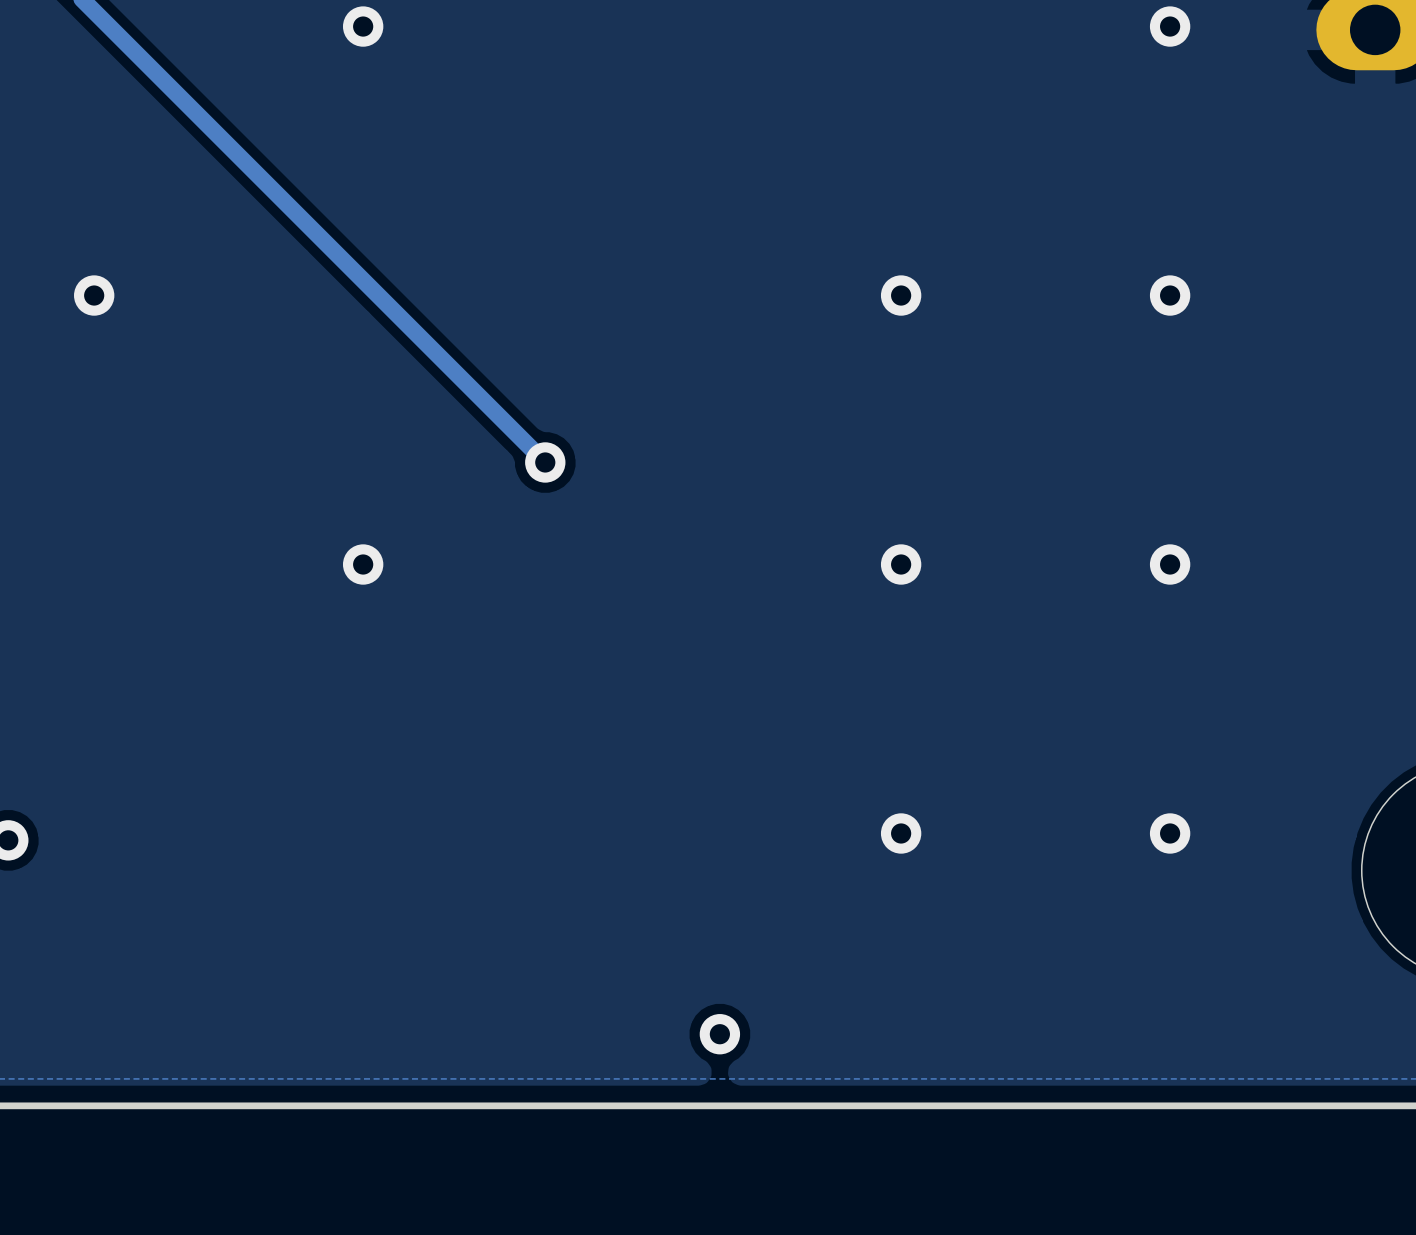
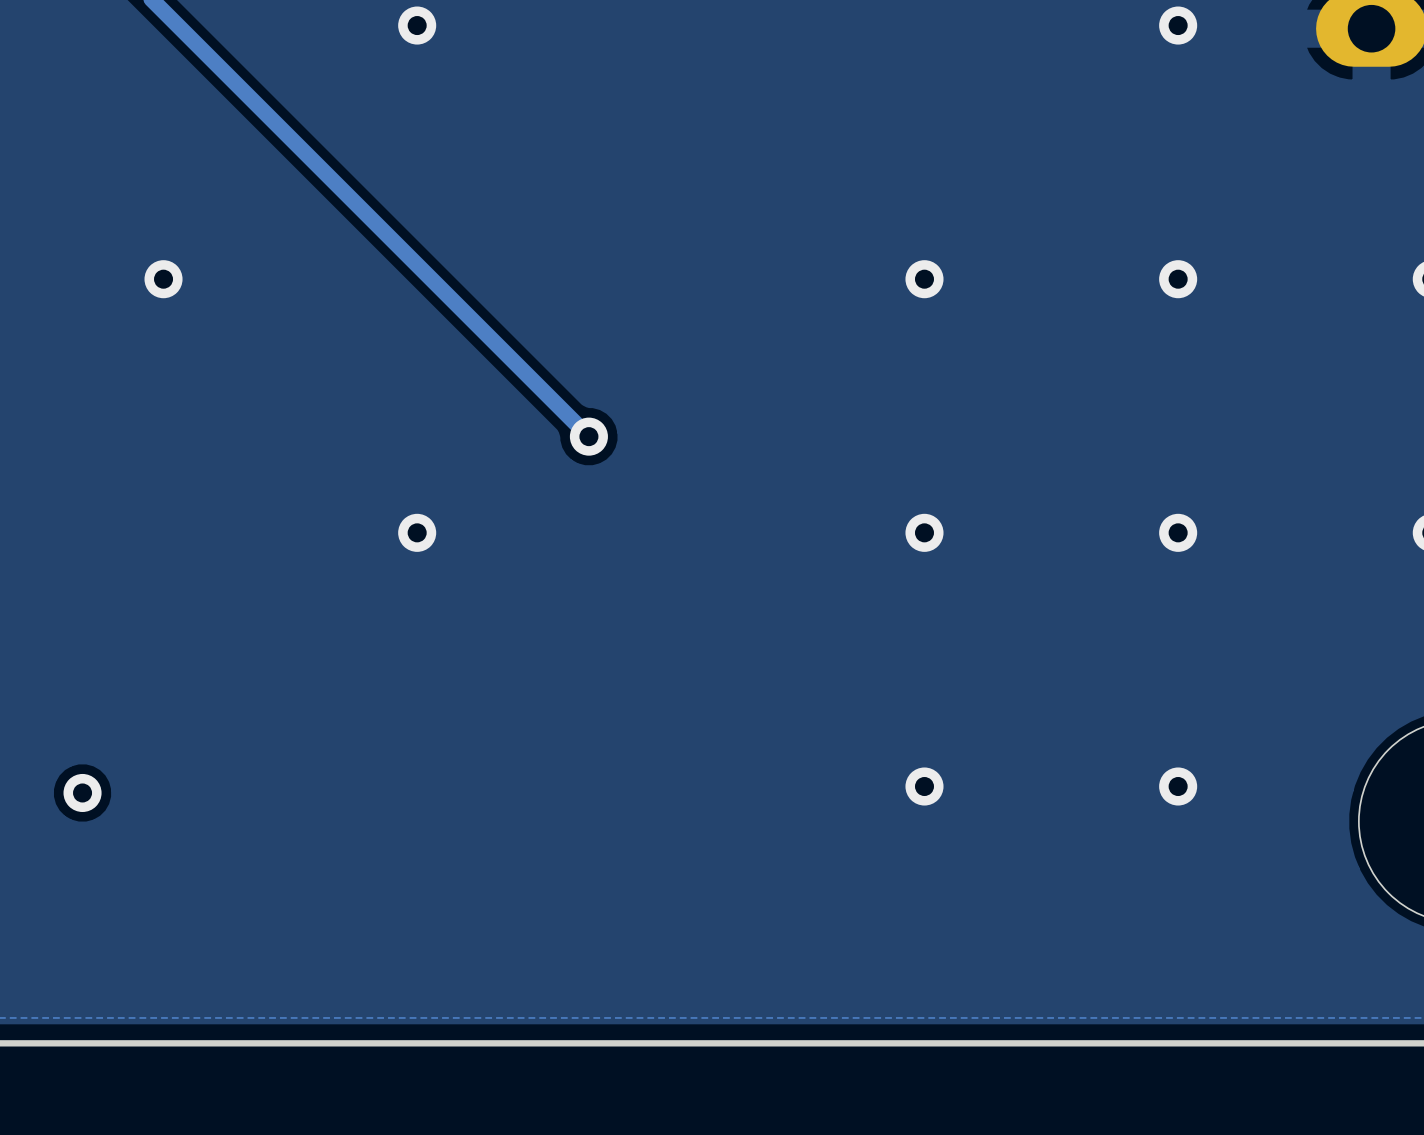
via: (719, 1034) -> none

